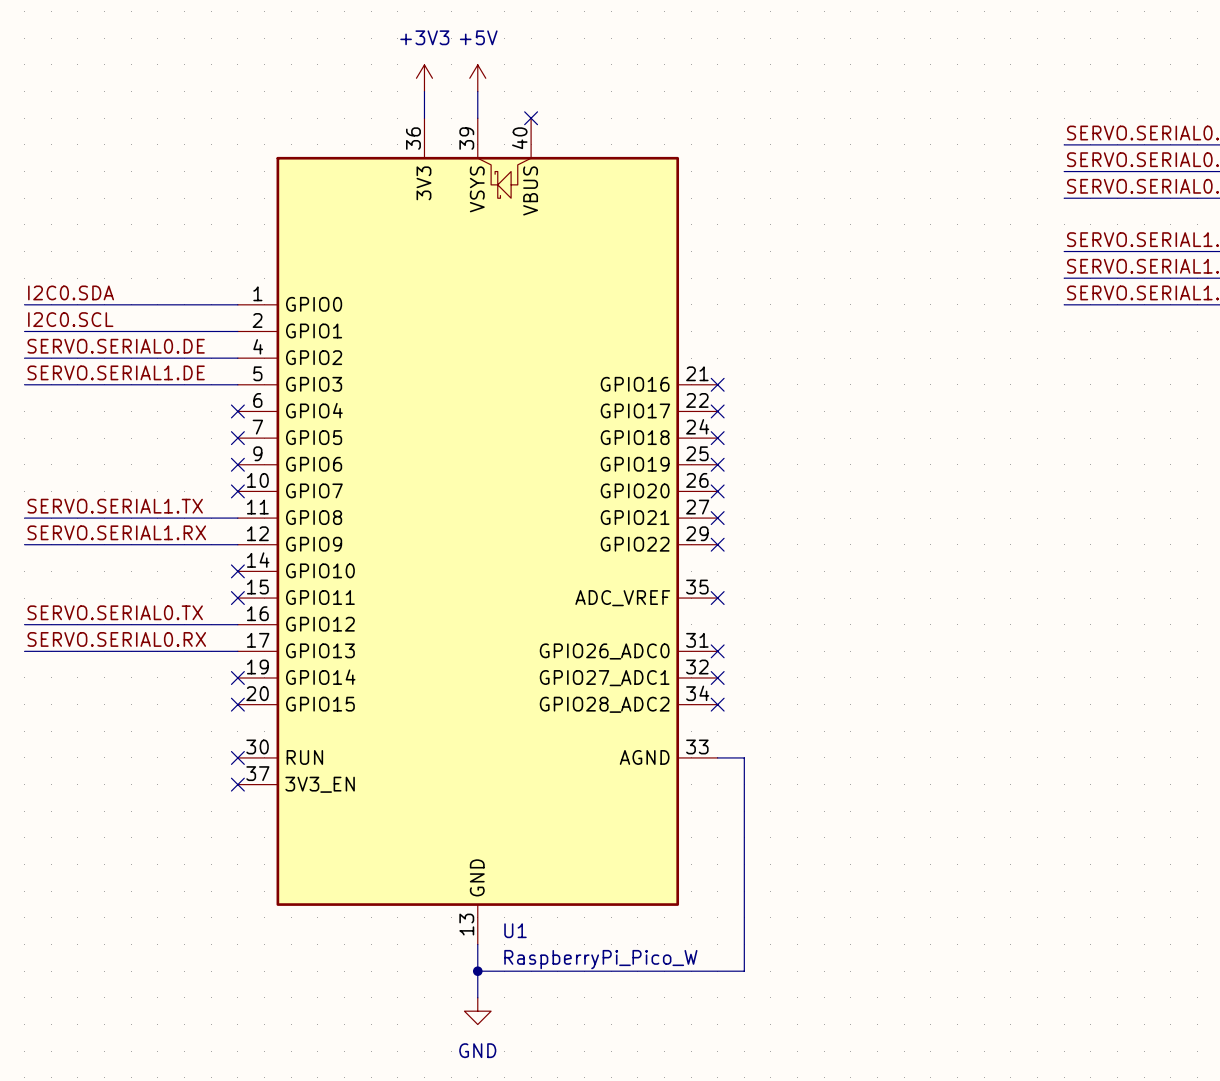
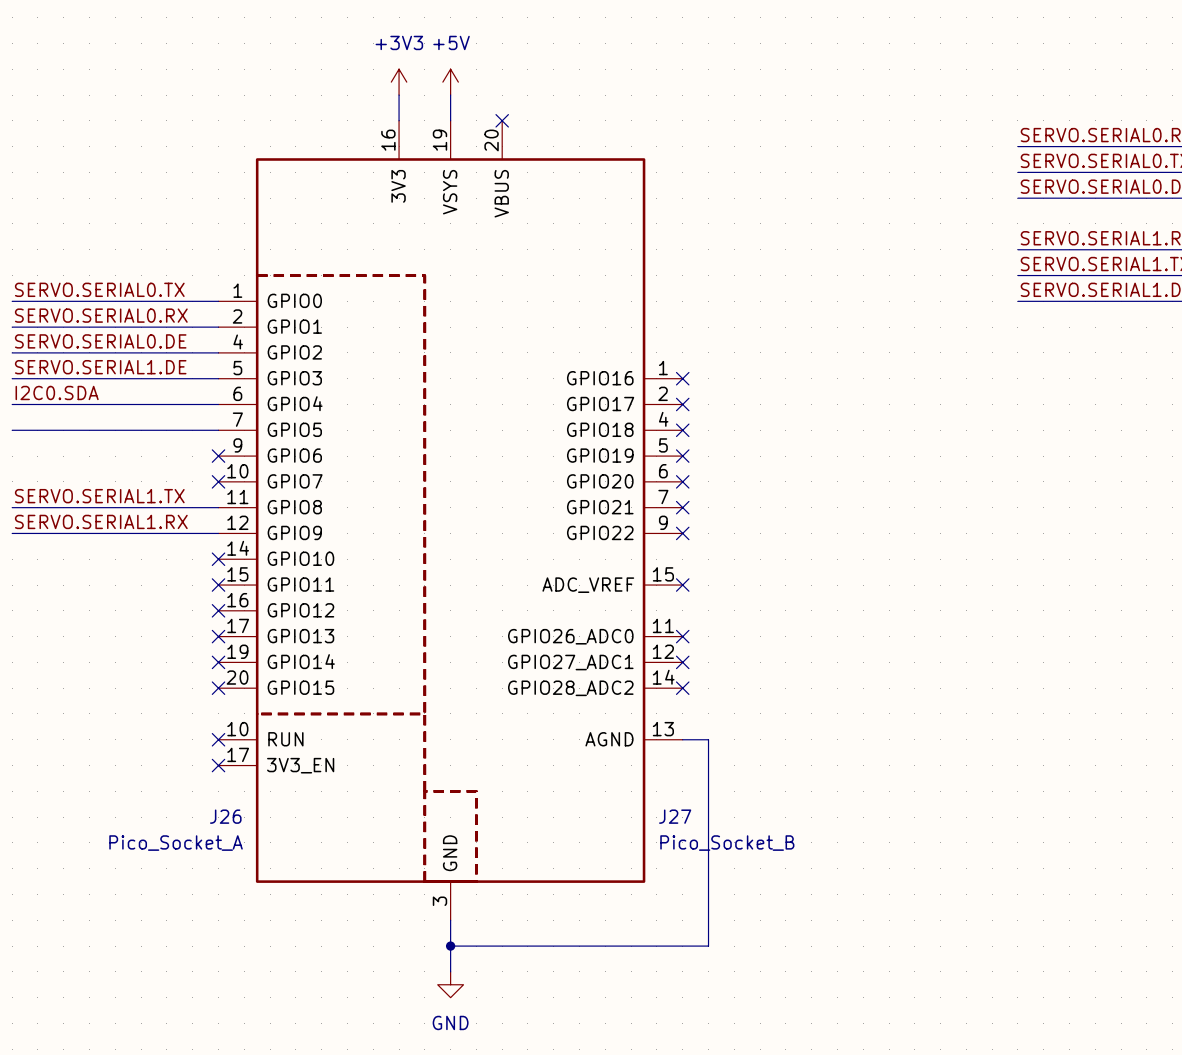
label: I2C0.SDA (71, 292) -> SERVO.SERIAL0.TX (99, 289)
label: I2C0.SCL (70, 319) -> SERVO.SERIAL0.RX (101, 315)
label: none -> I2C0.SDA (57, 392)
no-connect mark: (237, 411) -> none
no-connect mark: (237, 438) -> none
J27: none -> Pico_Socket_B (450, 501)
U1: RaspberryPi_Pico_W (477, 531) -> none
J26: none -> Pico_Socket_A (348, 597)
label: SERVO.SERIAL0.TX (115, 612) -> none
wire: (24, 624) (237, 624) -> (12, 404) (218, 404)
no-connect mark: none -> (218, 610)
label: SERVO.SERIAL0.RX (116, 639) -> none
wire: (24, 651) (237, 651) -> (12, 430) (218, 430)
no-connect mark: none -> (218, 636)

